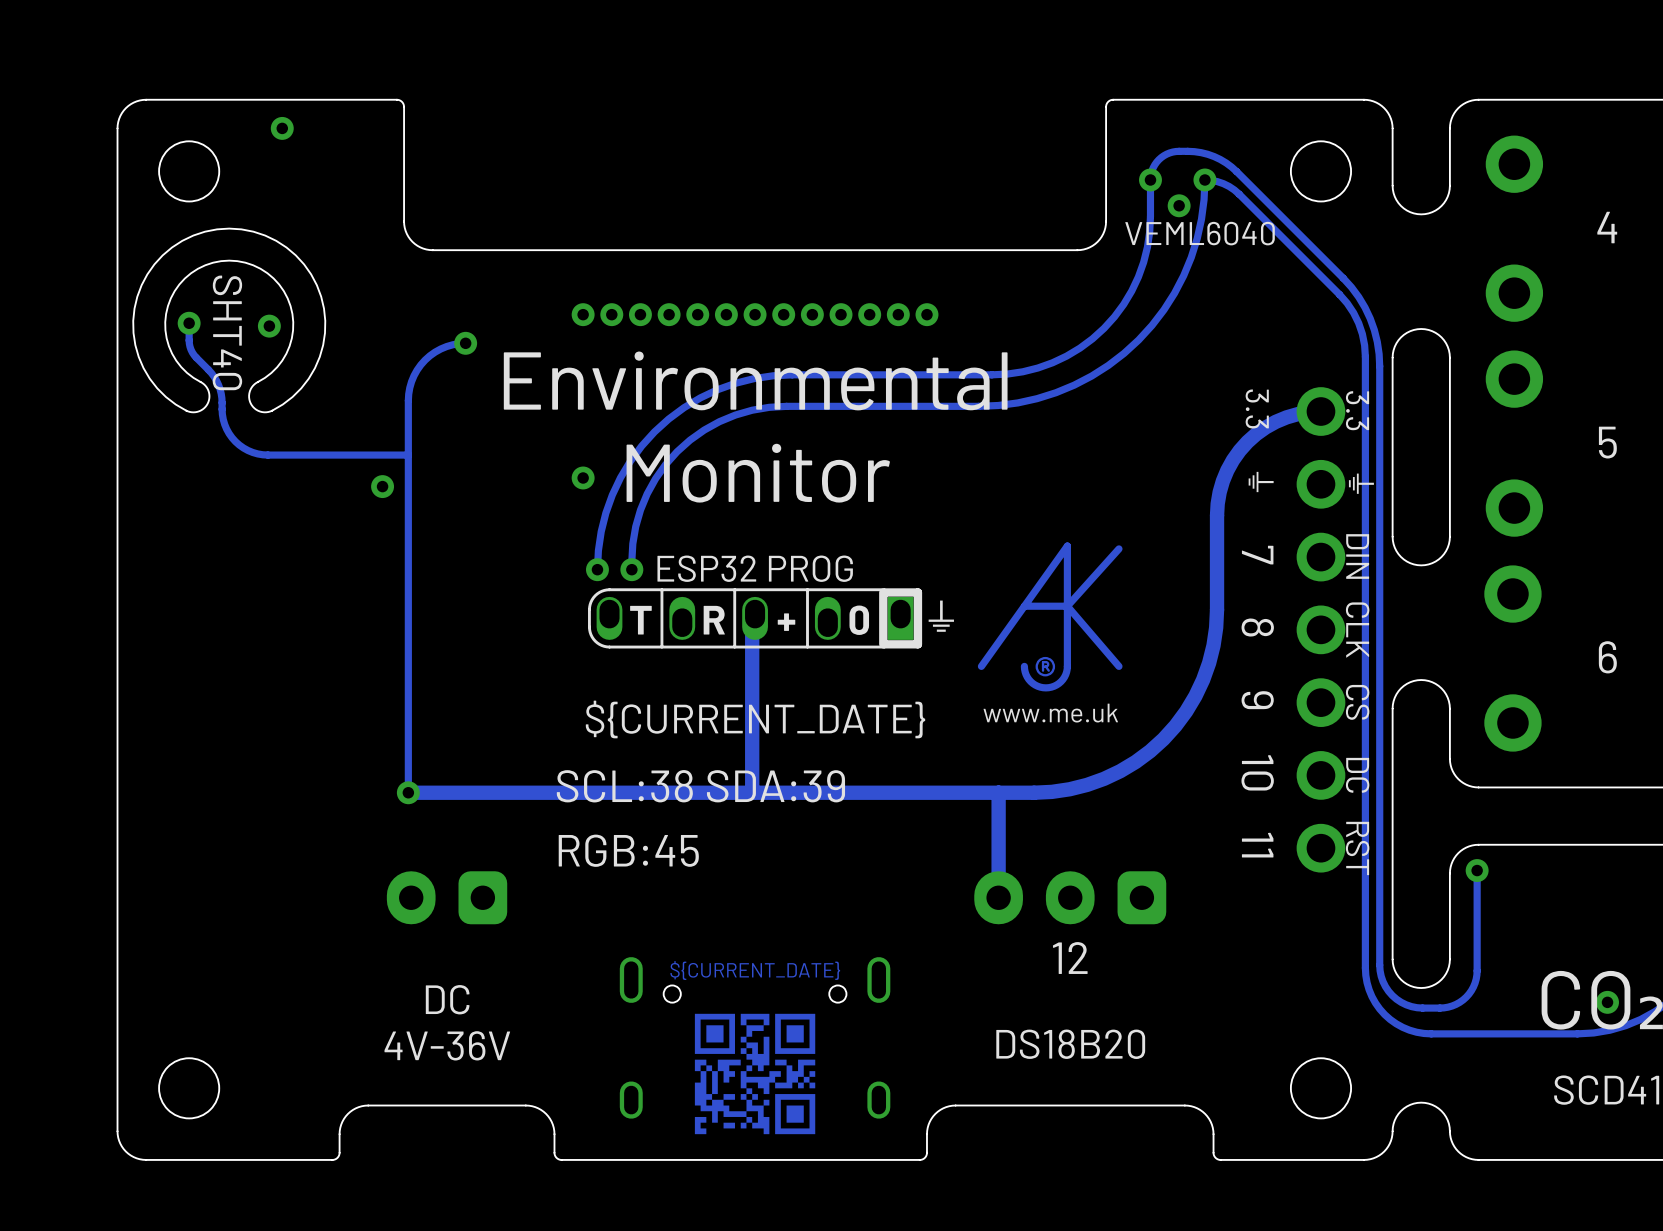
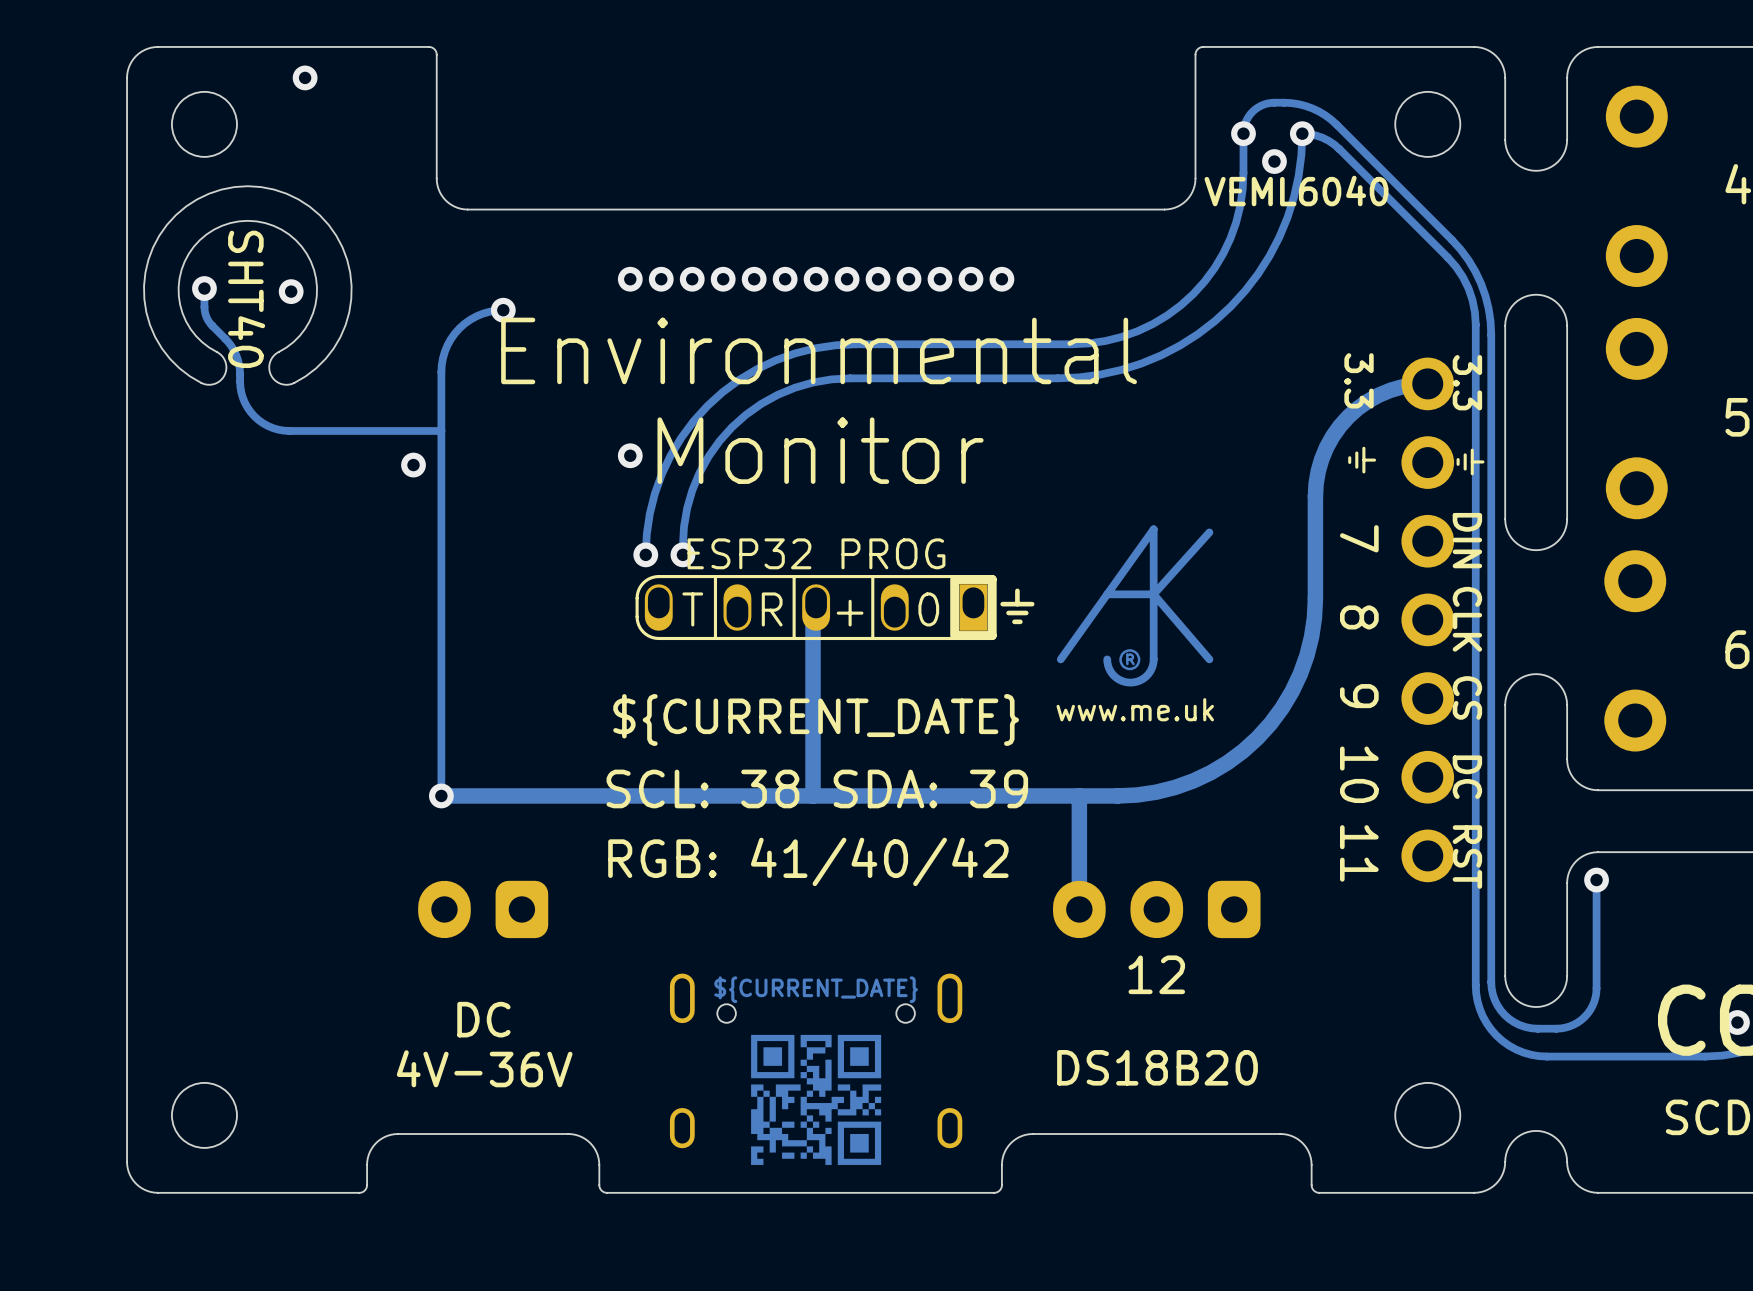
text: SCL:38 SDA:39 (700, 786) -> SCL: 38 SDA: 39 (817, 788)
text: RGB:45 (628, 850) -> RGB: 41/40/42 (808, 861)

